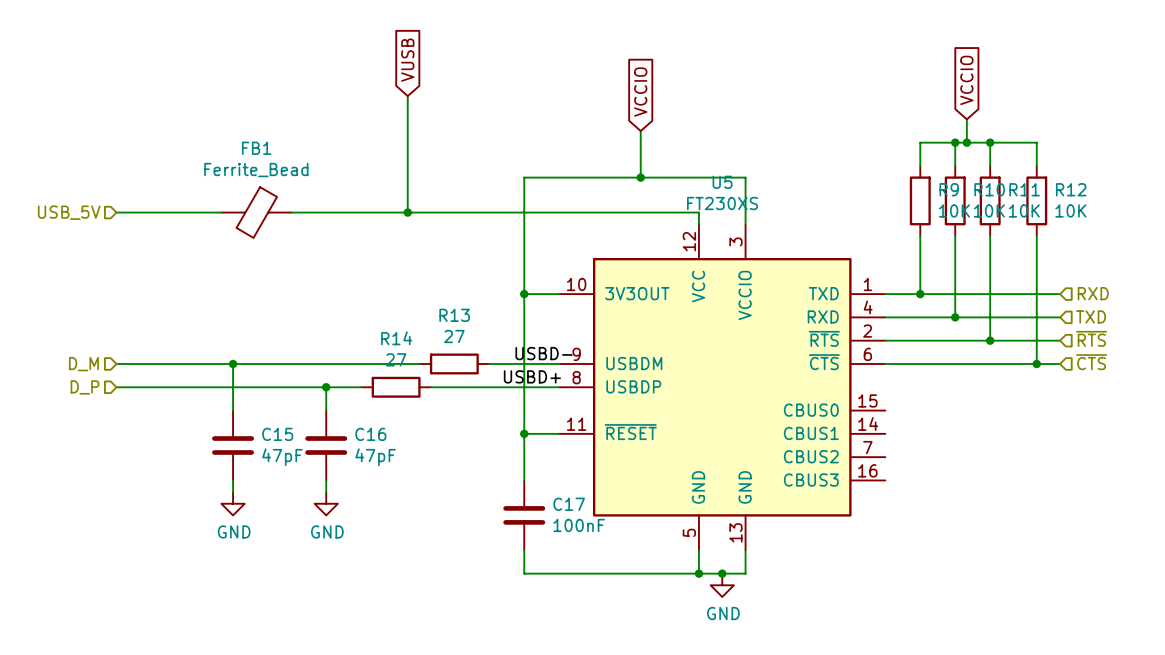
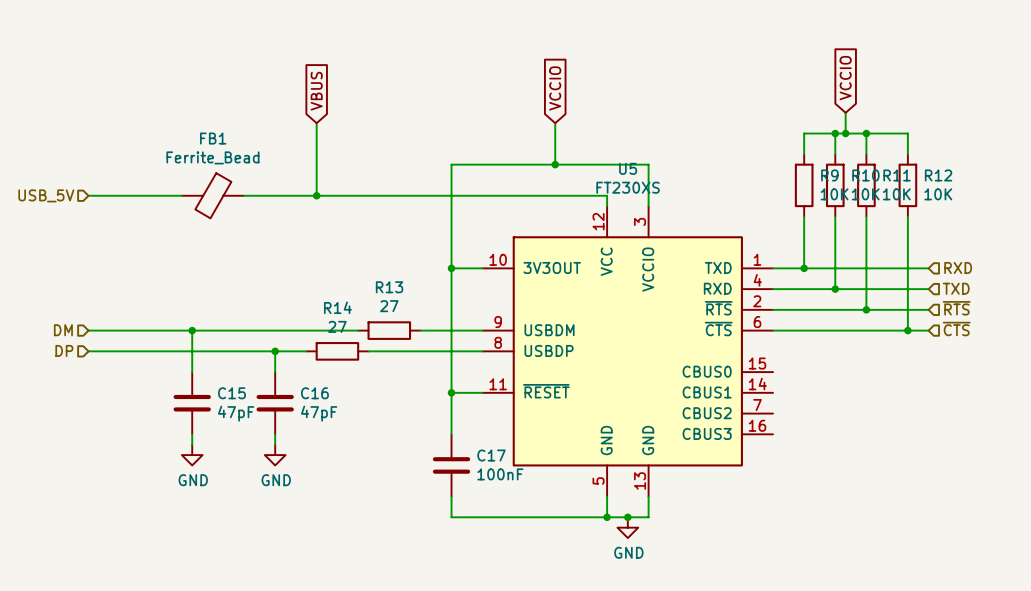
global label: VUSB (407, 60) -> none
global label: none -> VBUS (316, 91)
wire: (407, 96) (407, 212) -> none
wire: none -> (316, 123) (316, 195)
junction position: (407, 212) -> (316, 195)
label: USBD- (544, 353) -> none
hierarchical label: D_M (83, 364) -> DM (63, 330)
label: USBD+ (532, 376) -> none
hierarchical label: D_P (85, 387) -> DP (64, 350)

